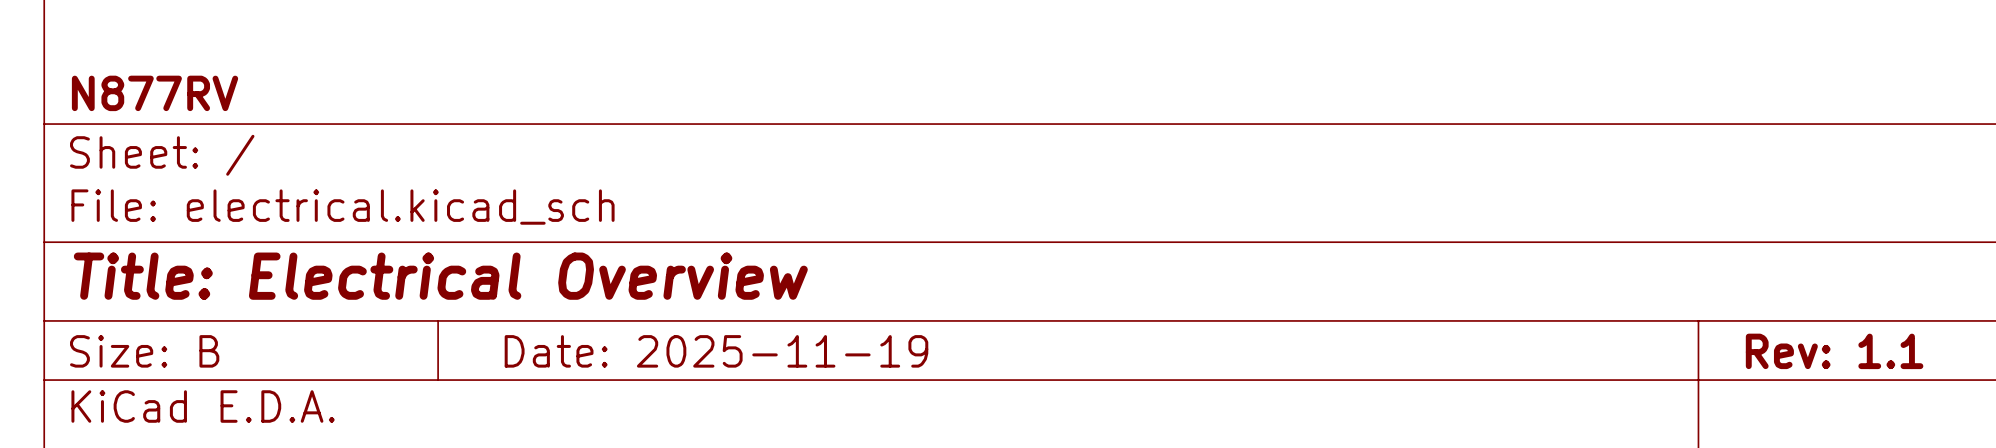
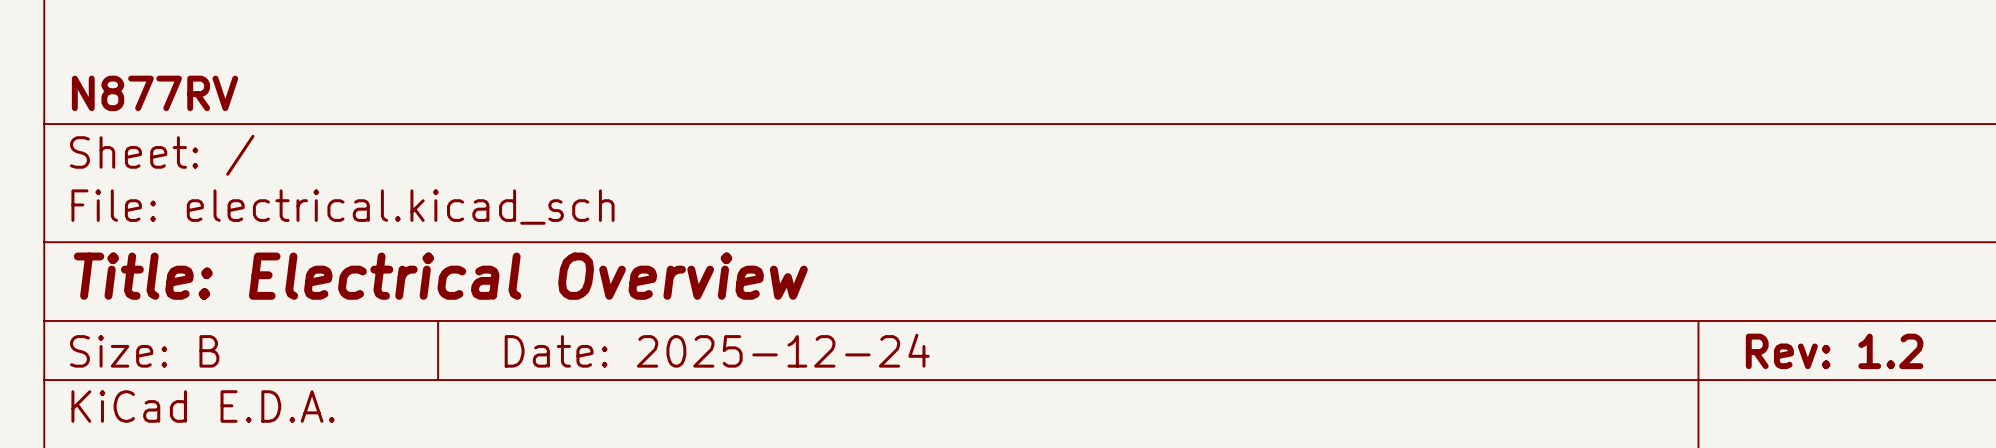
title block: Date: 2025-11-19 (716, 351) -> Date: 2025-12-24 (717, 350)
title block: Rev: 1.1 (1834, 351) -> Rev: 1.2 (1834, 351)

